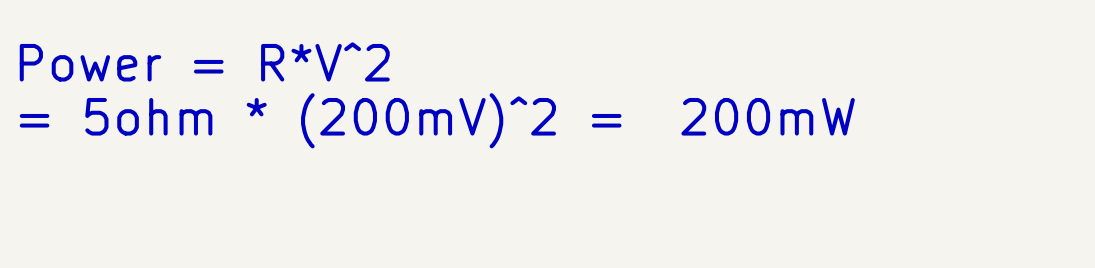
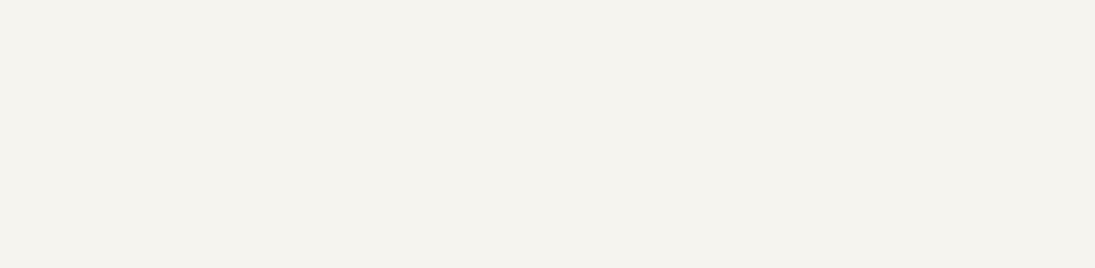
text: Power = R*V^2 (204, 61) -> none
text: = 5ohm * (200mV)^2 = 200mW (437, 120) -> none

